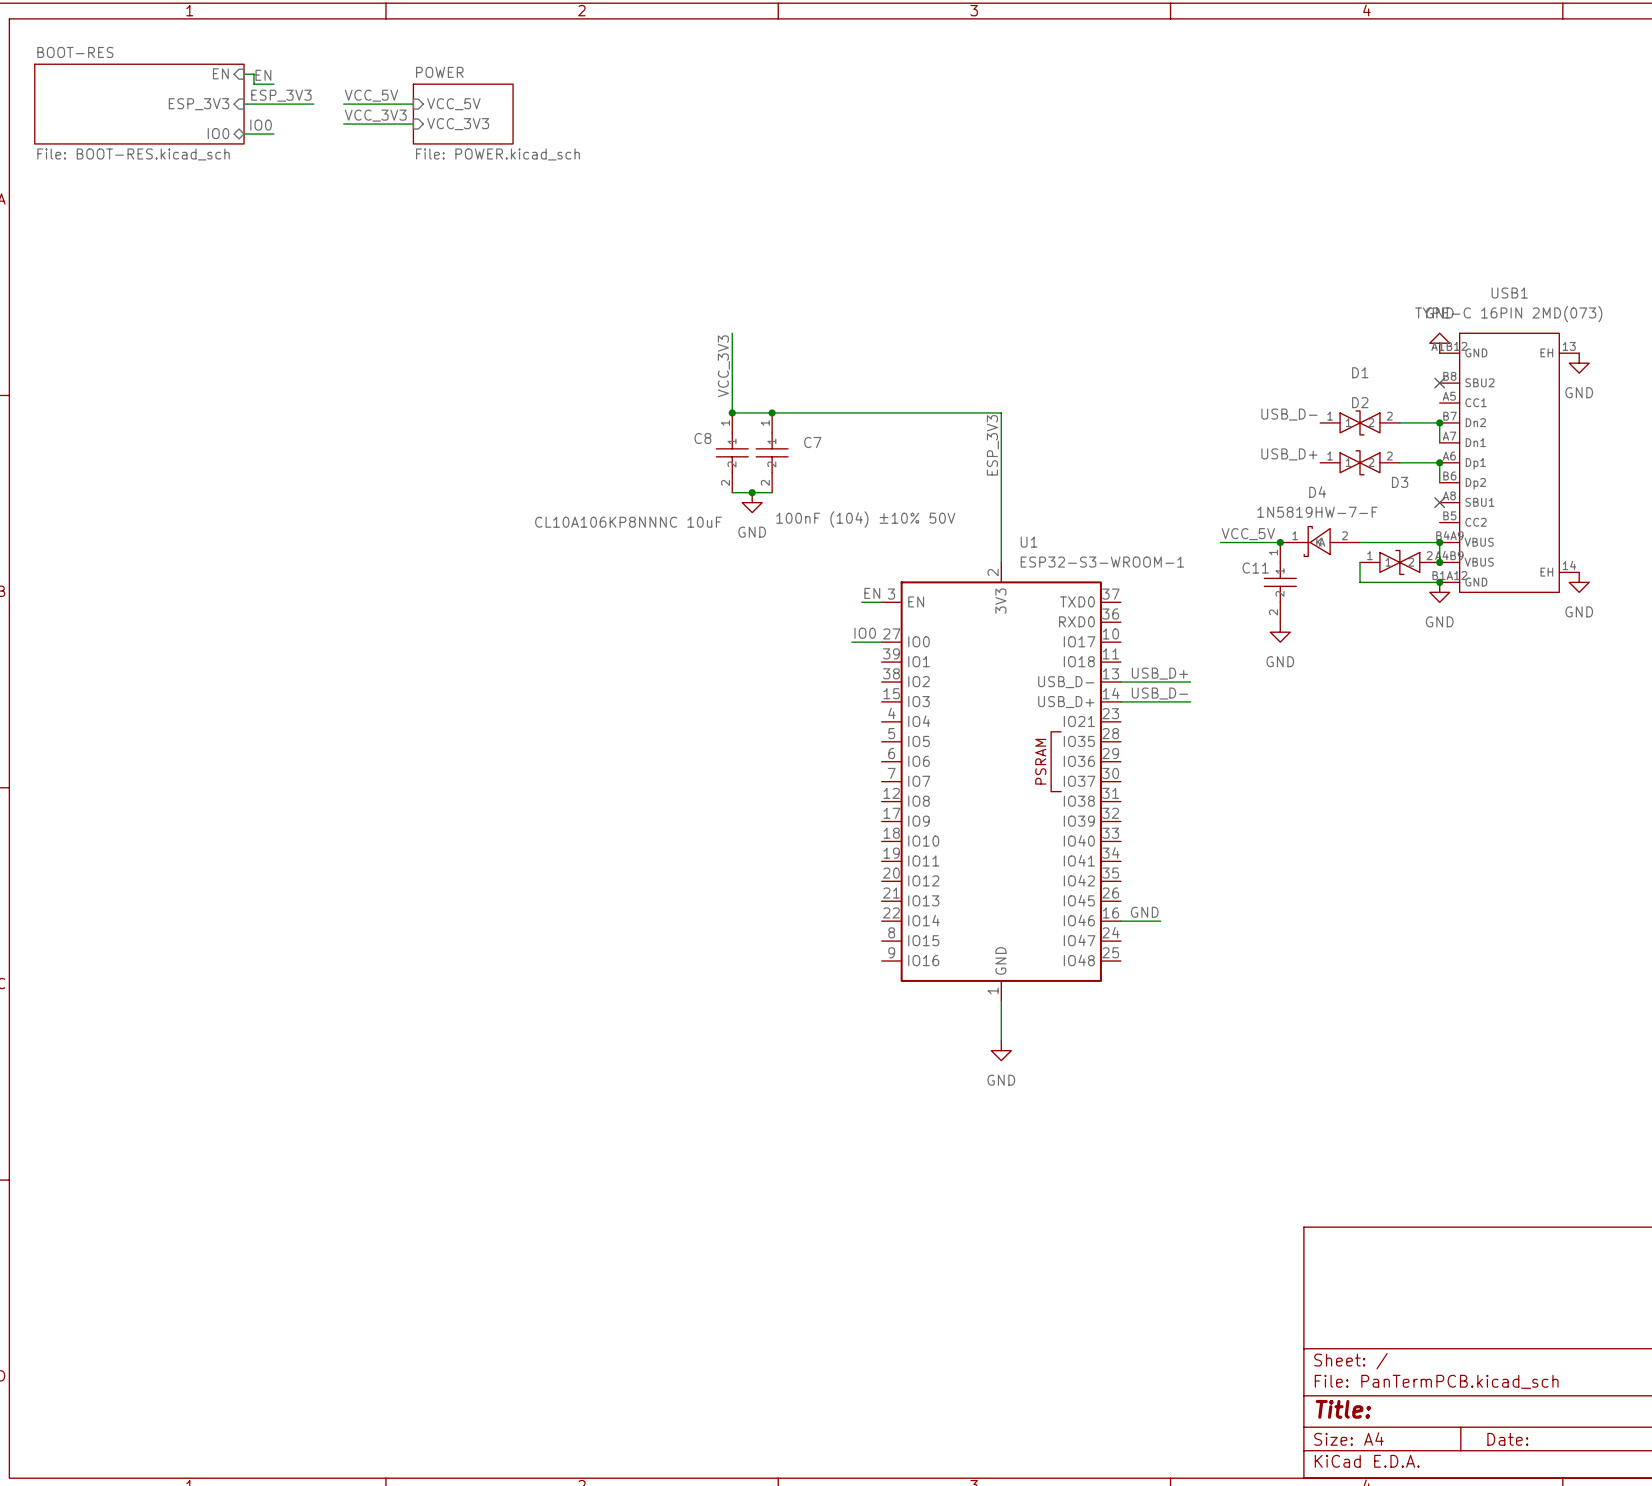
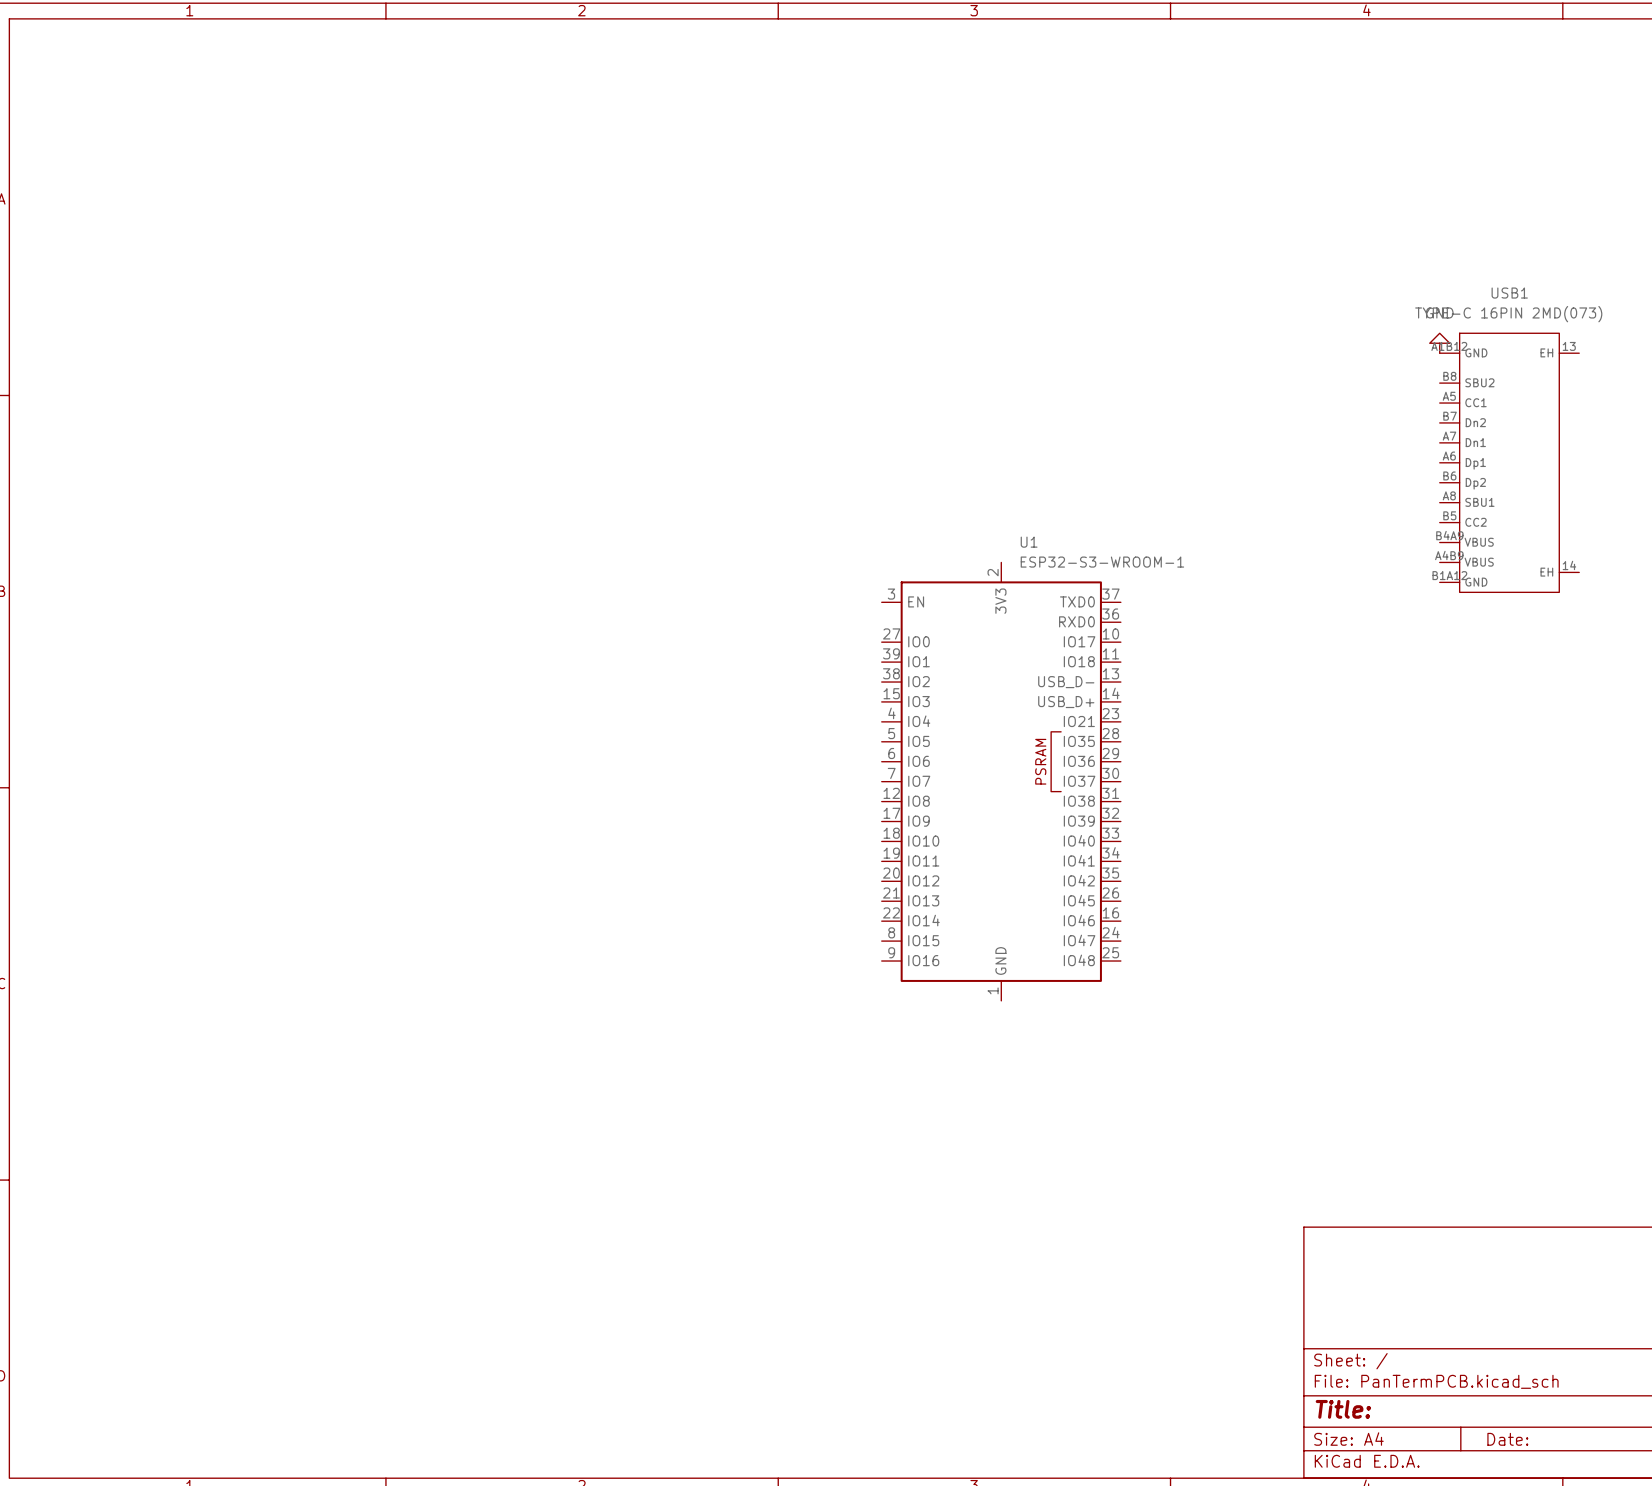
sheet pin: EN (220, 73) -> none
wire: (244, 74) (253, 74) (253, 84) (273, 84) -> none
label: EN (263, 75) -> none
label: ESP_3V3 (281, 95) -> none
label: VCC_5V (371, 95) -> none
sheet BOOT-RES: File: BOOT-RES.kicad_sch (139, 104) -> none
sheet pin: ESP_3V3 (199, 104) -> none
wire: (244, 104) (313, 104) -> none
wire: (343, 104) (413, 104) -> none
sheet pin: VCC_5V (453, 104) -> none
sheet POWER: File: POWER.kicad_sch (463, 114) -> none
label: VCC_3V3 (375, 115) -> none
wire: (343, 124) (413, 124) -> none
sheet pin: VCC_3V3 (458, 124) -> none
label: IO0 (261, 125) -> none
sheet pin: IO0 (218, 133) -> none
wire: (244, 133) (273, 133) -> none
wire: (732, 333) (732, 412) (1001, 412) (1001, 562) -> none
power symbol: GND (1579, 363) -> none
label: VCC_3V3 (723, 366) -> none
no-connect mark: (1439, 383) -> none
junction: (732, 412) -> none
junction: (772, 412) -> none
label: USB_D- (1289, 414) -> none
D1: (1360, 422) -> none
wire: (1399, 422) (1439, 422) (1439, 442) -> none
junction: (1439, 422) -> none
label: ESP_3V3 (992, 445) -> none
C8: CL10A106KP8NNNC 10uF (732, 452) -> none
C7: 100nF (104) ±10% 50V (772, 452) -> none
label: USB_D+ (1289, 454) -> none
D2: (1360, 462) -> none
wire: (1399, 462) (1439, 462) (1439, 482) -> none
junction: (1439, 462) -> none
wire: (732, 492) (772, 492) -> none
junction: (752, 492) -> none
power symbol: GND (752, 502) -> none
no-connect mark: (1439, 502) -> none
label: VCC_5V (1248, 534) -> none
D4: 1N5819HW-7-F (1320, 541) -> none
wire: (1220, 542) (1280, 542) -> none
junction: (1280, 542) -> none
wire: (1360, 542) (1439, 542) (1439, 562) -> none
junction: (1439, 542) -> none
wire: (1360, 562) (1360, 582) (1439, 582) -> none
D3: (1399, 562) -> none
junction: (1439, 562) -> none
C11: (1280, 582) -> none
junction: (1439, 582) -> none
power symbol: GND (1579, 582) -> none
power symbol: GND (1439, 592) -> none
label: EN (872, 593) -> none
wire: (861, 602) (881, 602) -> none
power symbol: GND (1280, 632) -> none
label: IO0 (865, 633) -> none
wire: (851, 642) (881, 642) -> none
label: USB_D+ (1159, 673) -> none
wire: (1120, 682) (1190, 682) -> none
label: USB_D- (1159, 693) -> none
wire: (1120, 701) (1190, 701) -> none
label: GND (1144, 912) -> none
wire: (1120, 921) (1160, 921) -> none
wire: (1001, 1000) (1001, 1040) -> none
power symbol: GND (1001, 1050) -> none

